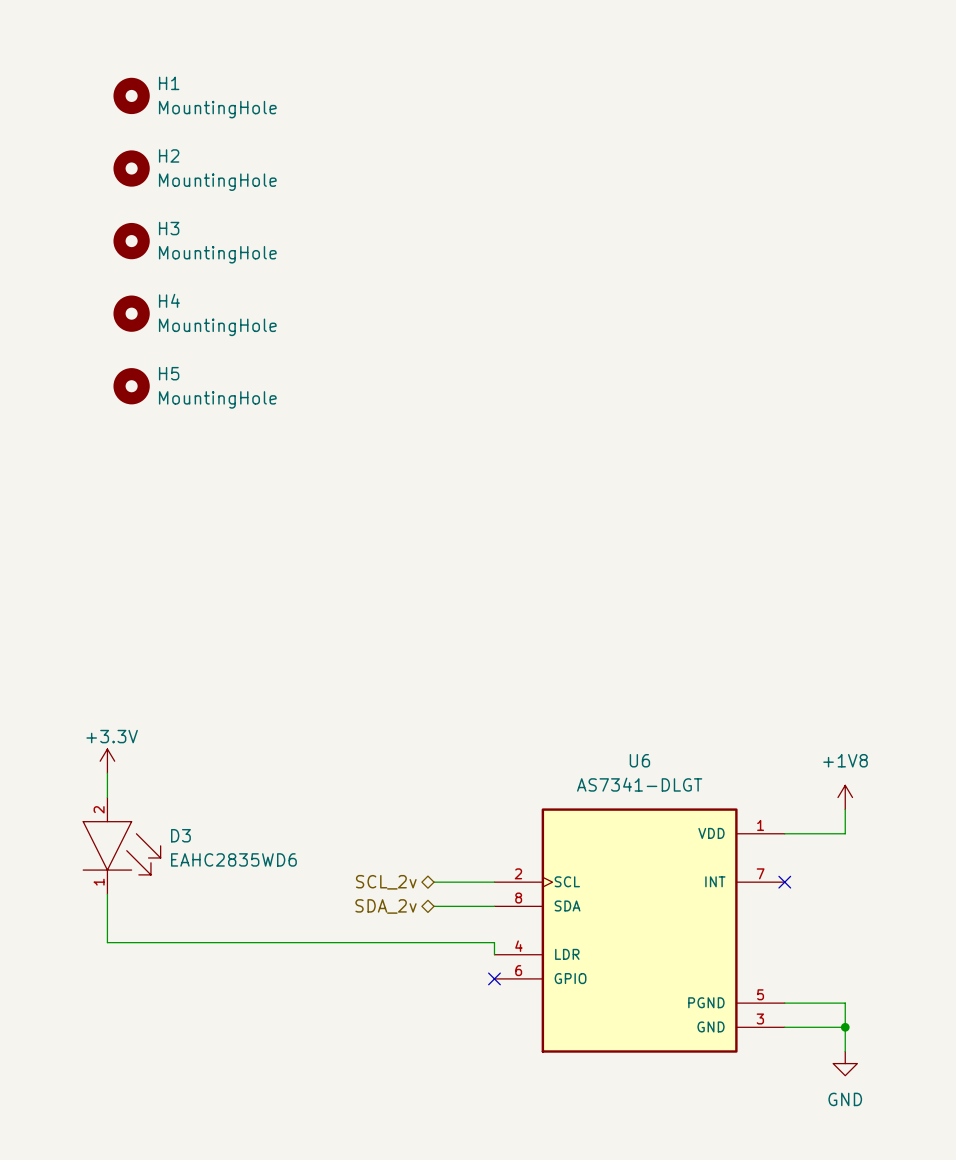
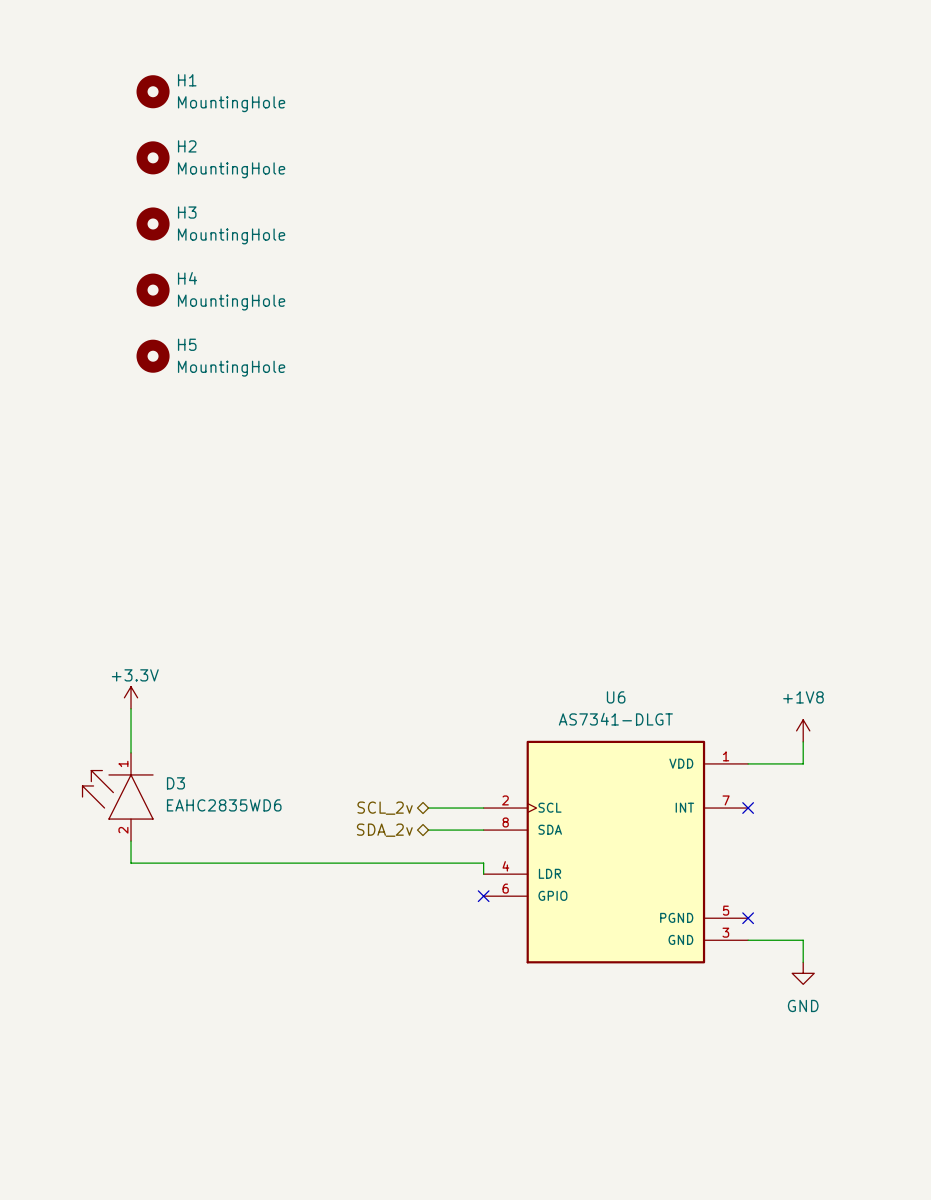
D3 rotation: 0° (121, 848) -> 180° (117, 794)
wire: (784, 1003) (845, 1003) (845, 1027) -> none
no-connect mark: none -> (748, 918)
junction: (845, 1027) -> none

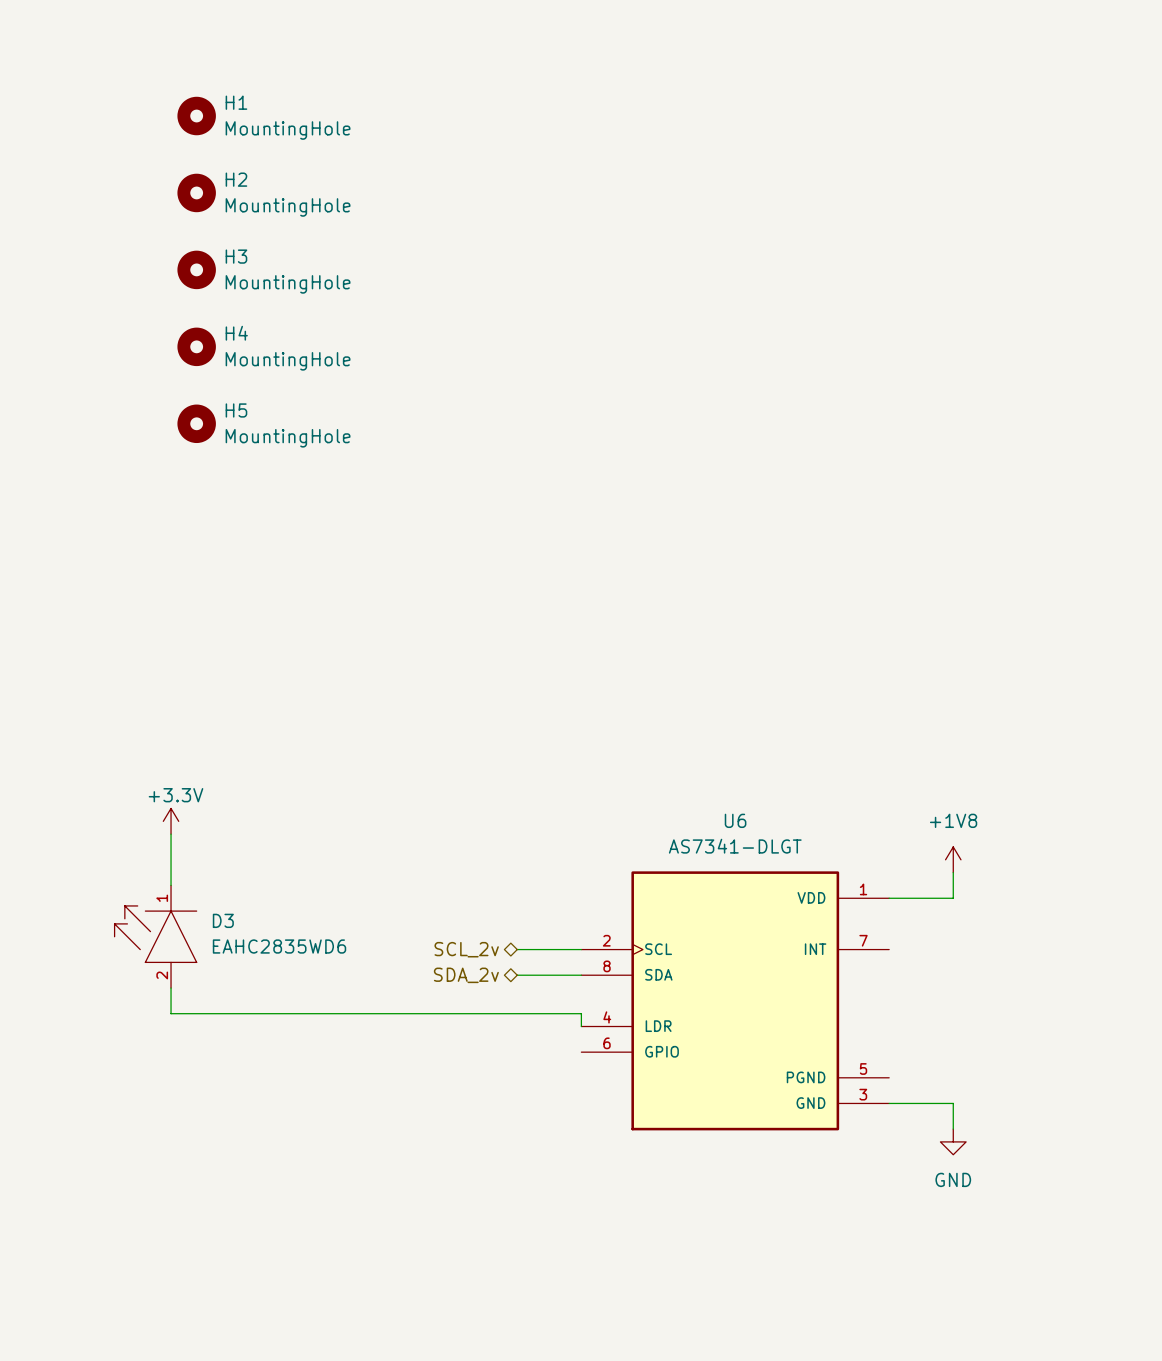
no-connect mark: (748, 808) -> none
no-connect mark: (483, 896) -> none
no-connect mark: (748, 918) -> none

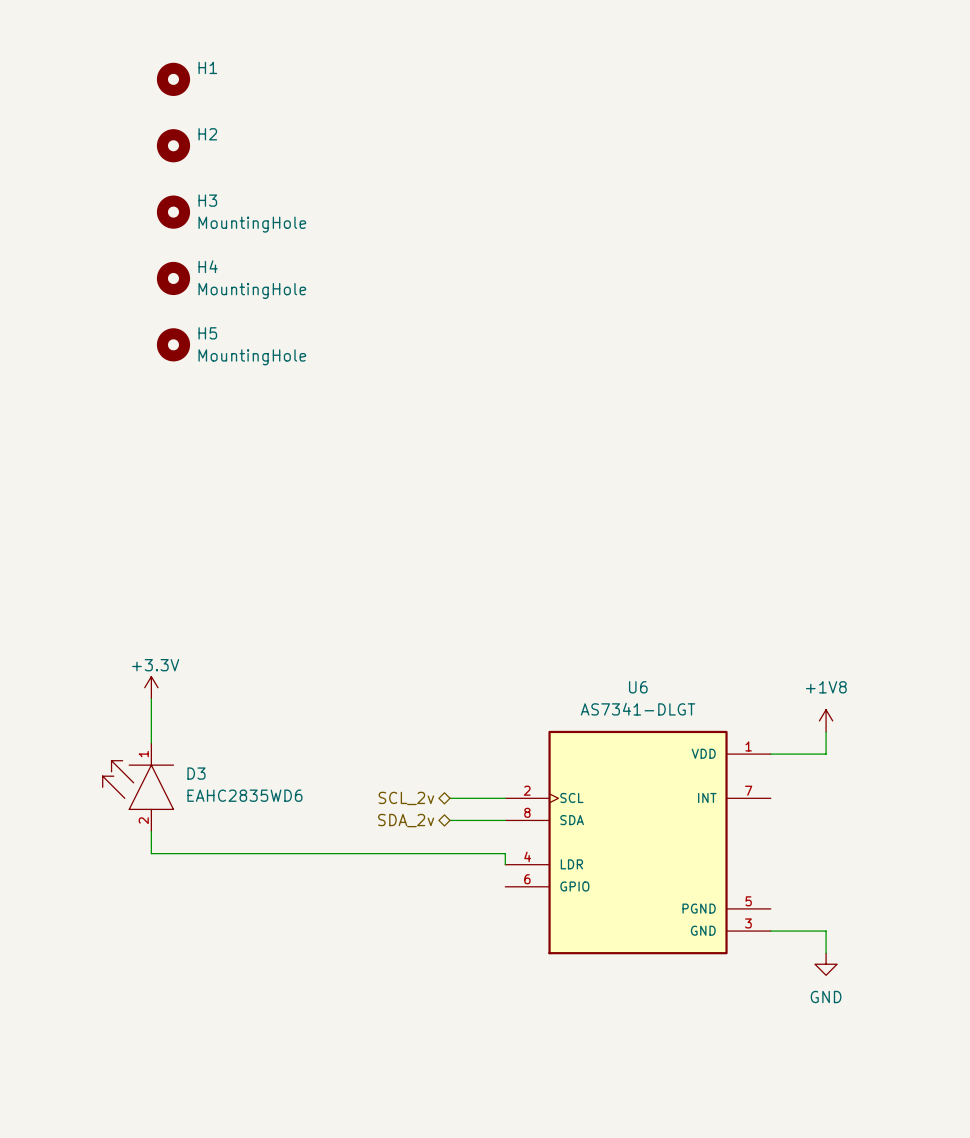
H1 value: MountingHole (288, 130) -> none
H2 value: MountingHole (288, 207) -> none

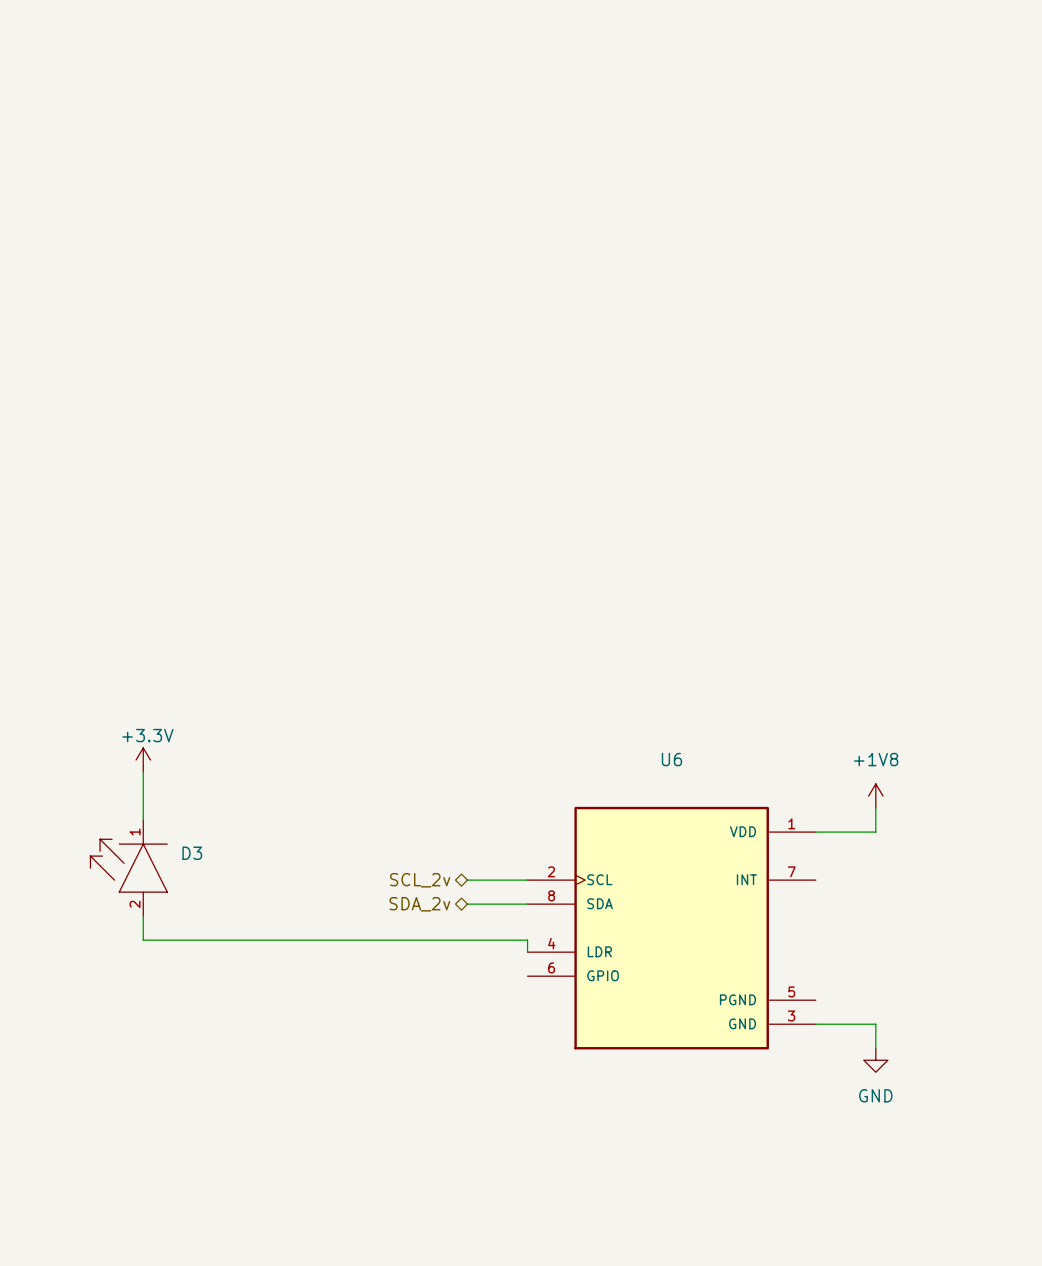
H1: (173, 79) -> none
H2: (173, 145) -> none
H3: MountingHole (173, 212) -> none
H4: MountingHole (173, 278) -> none
H5: MountingHole (173, 344) -> none
U6 value: AS7341-DLGT (638, 709) -> none
D3 value: EAHC2835WD6 (244, 795) -> none

